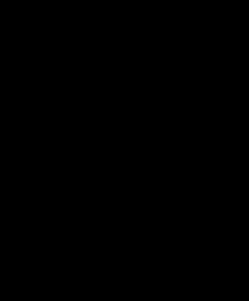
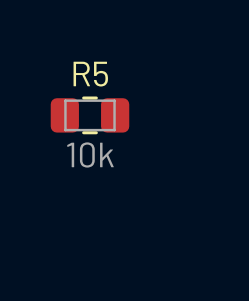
R5: none -> 10k (89, 115)

